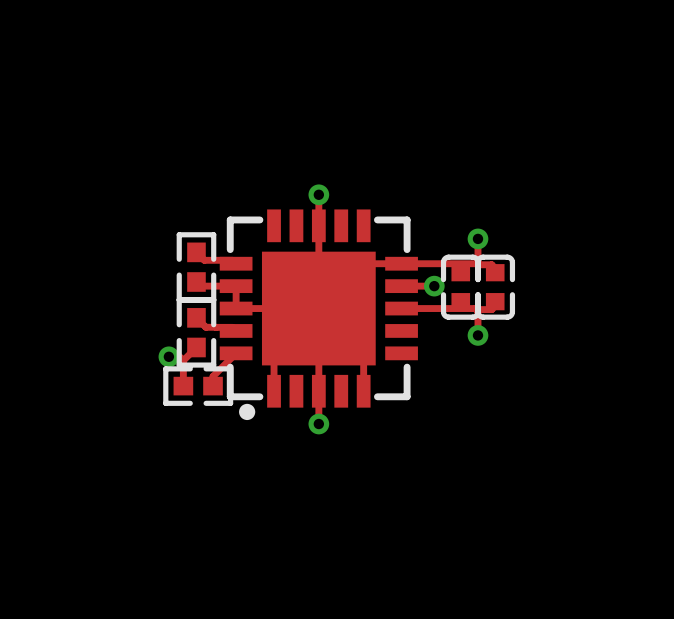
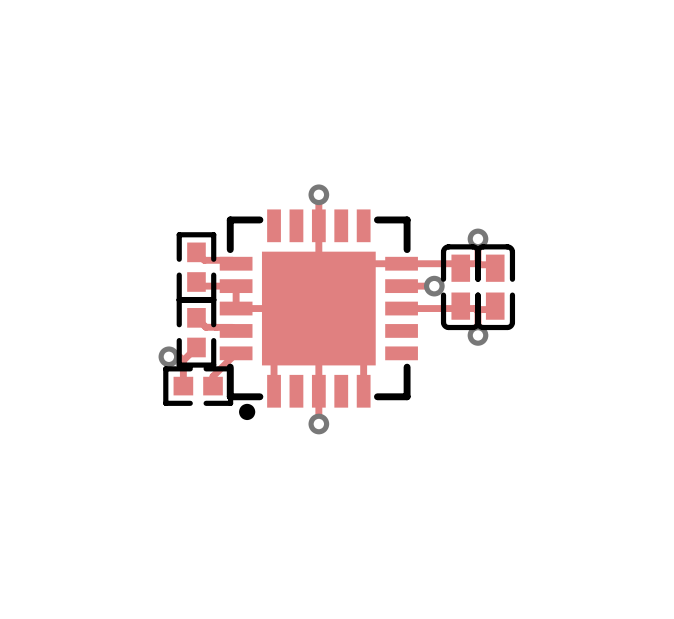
part footprint: [440, 254, 481, 320] -> [440, 244, 481, 331]
part footprint: [475, 254, 516, 320] -> [475, 244, 516, 331]

